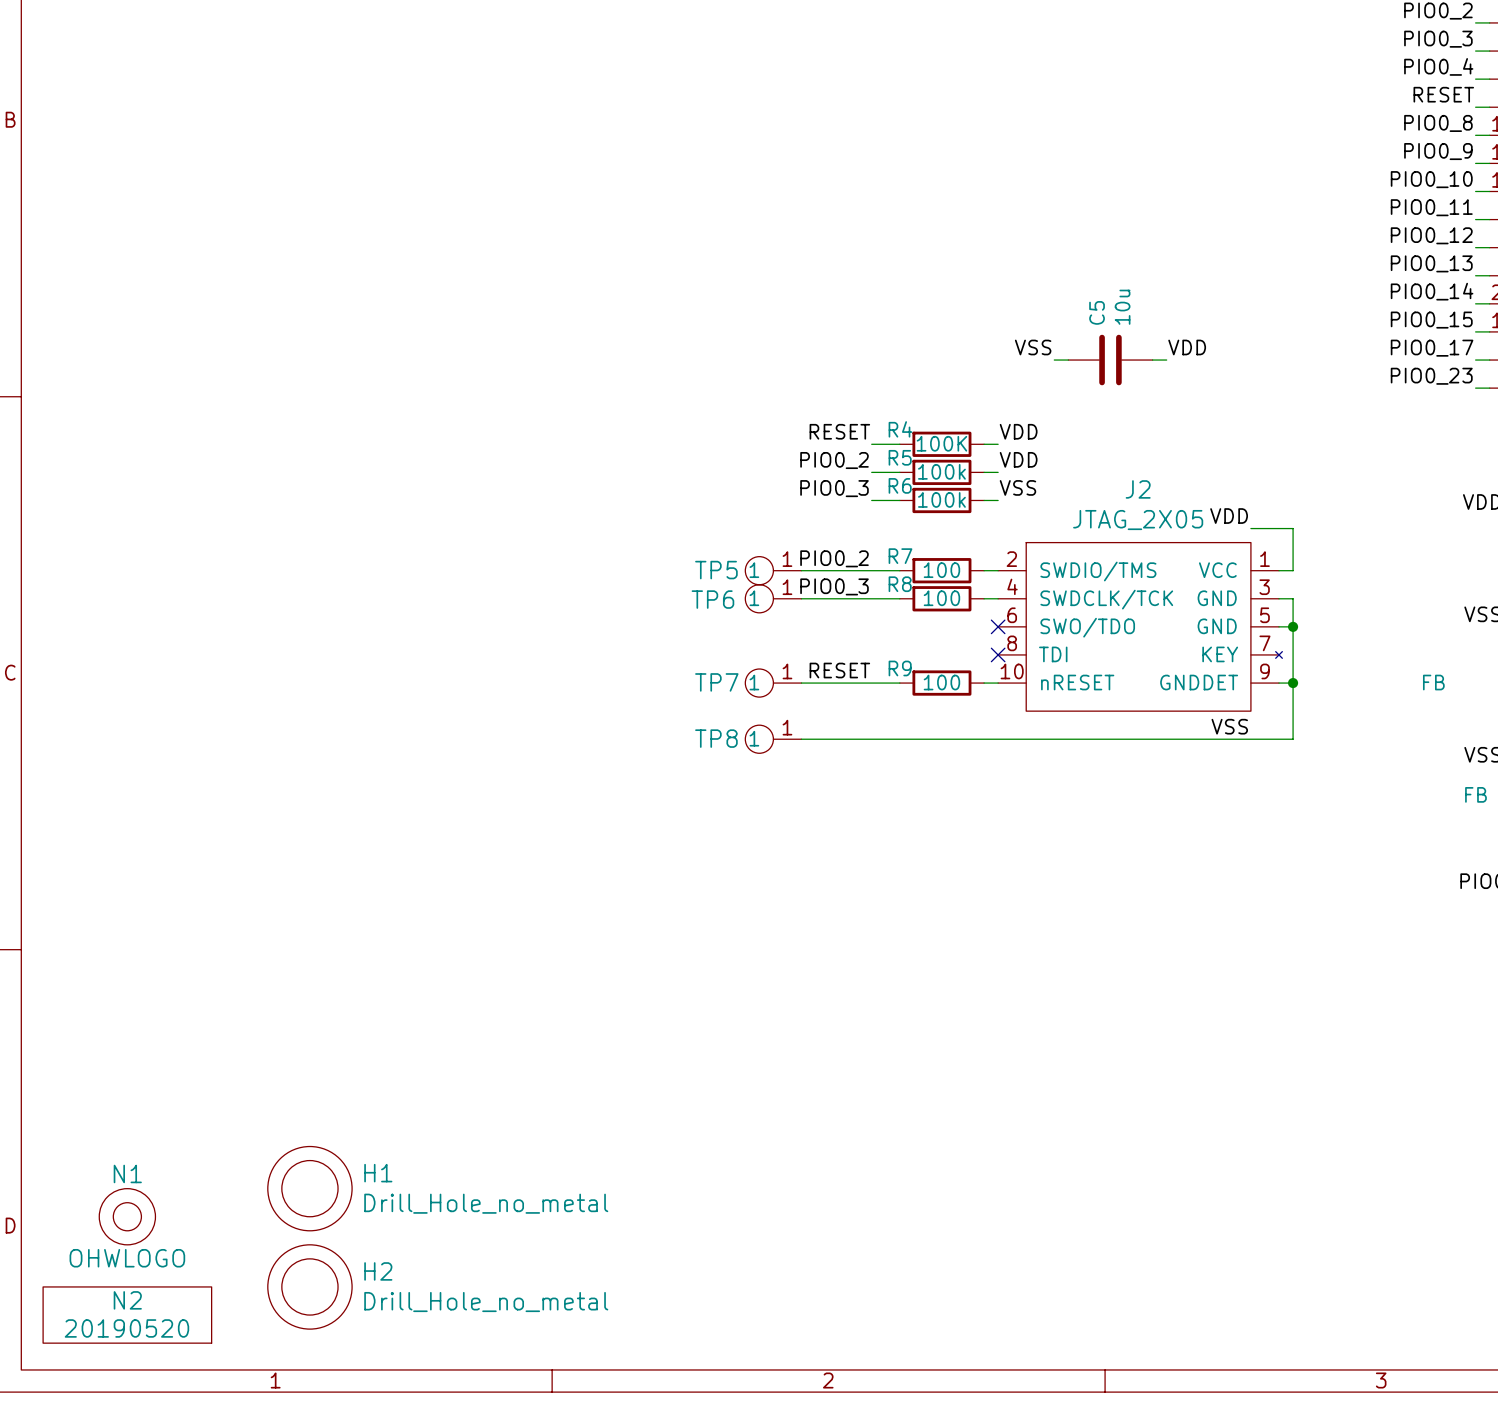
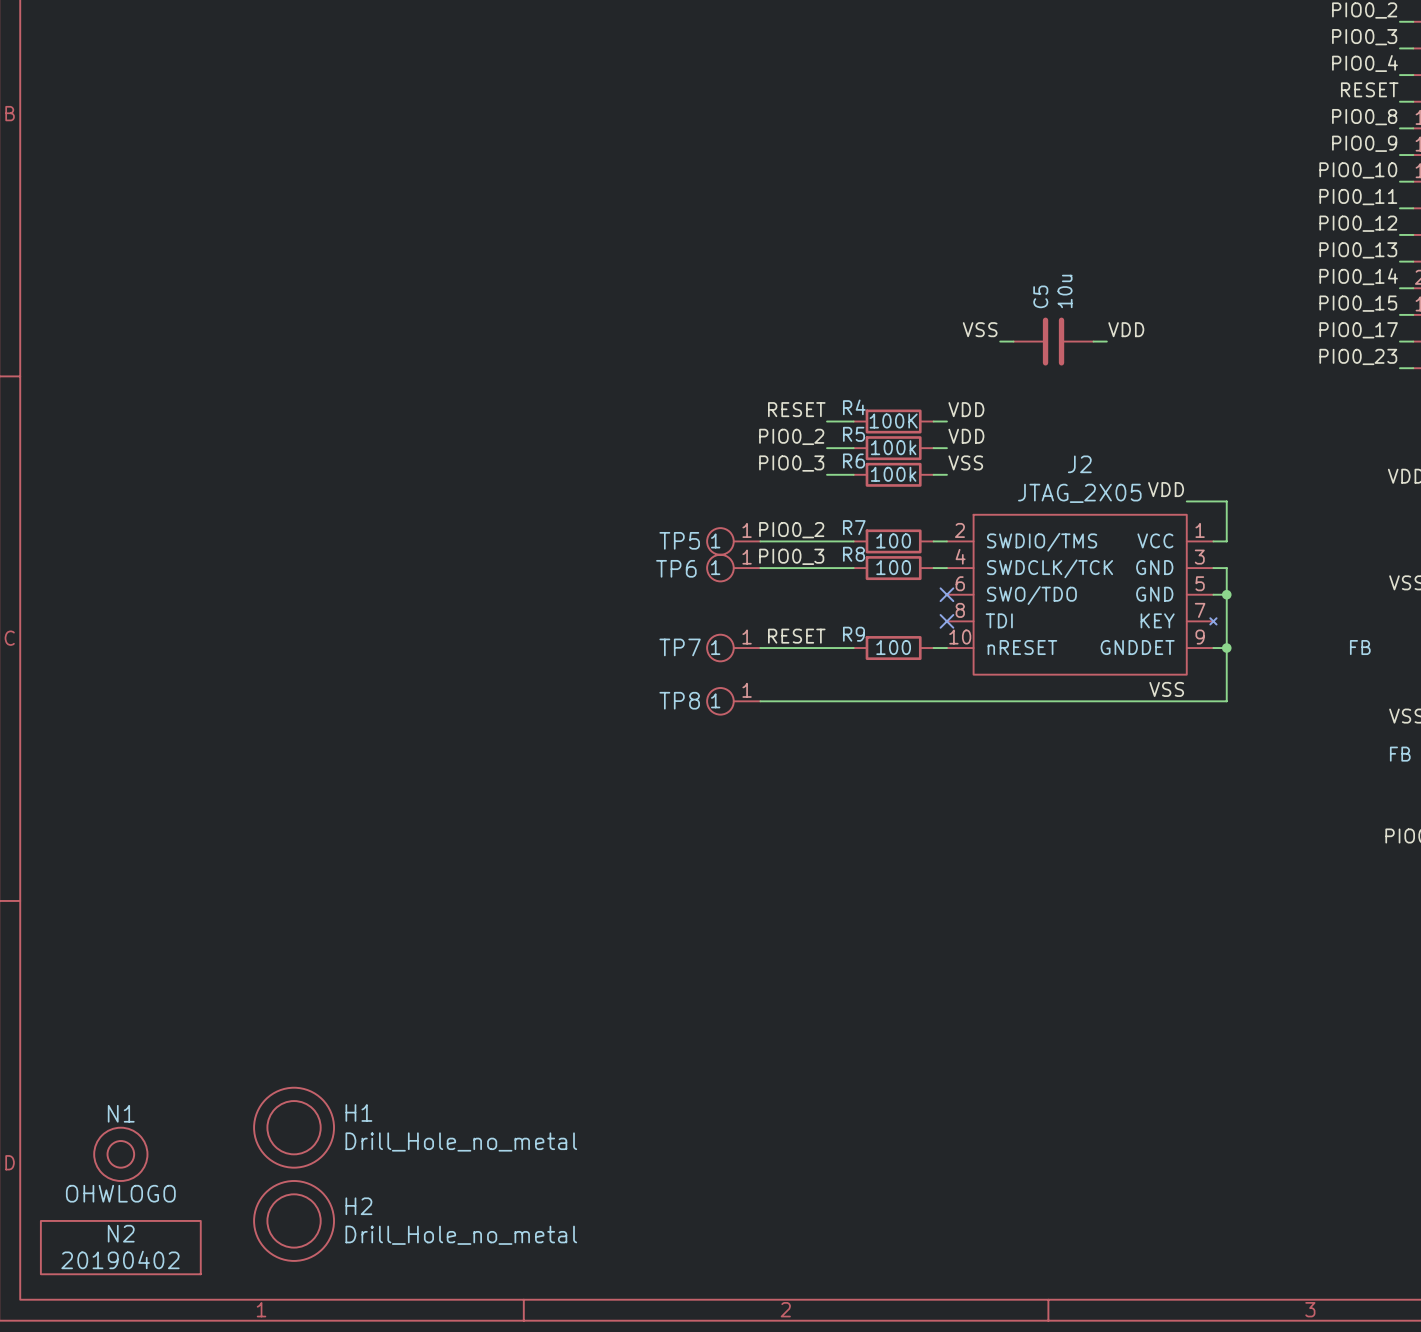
N2 value: 20190520 (126, 1328) -> 20190402 (120, 1259)

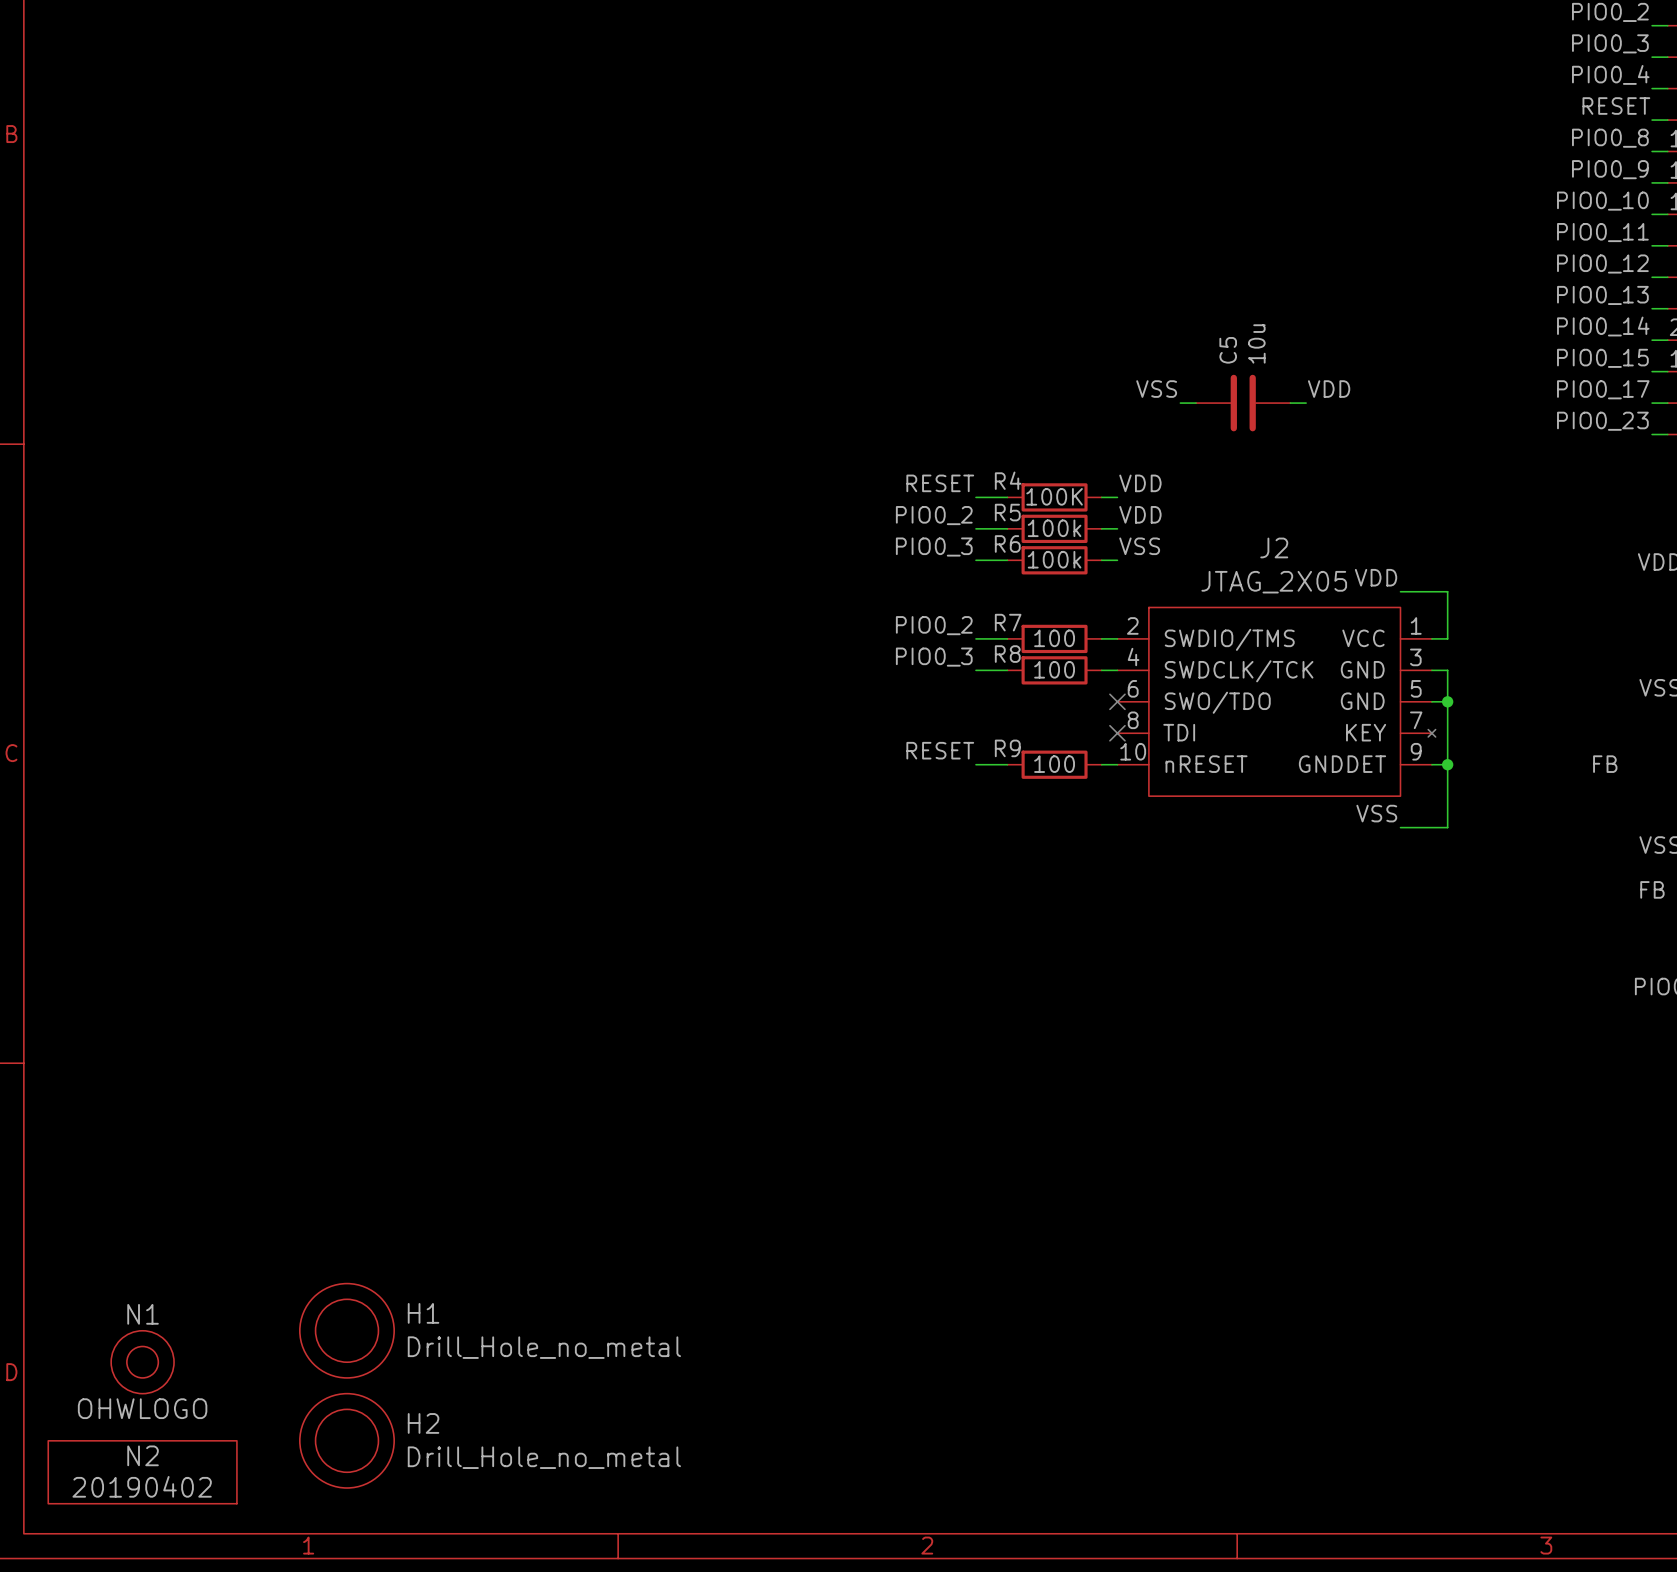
TP5: (733, 541) -> none
wire: (760, 541) (827, 541) -> none
TP6: (733, 568) -> none
wire: (760, 568) (827, 568) -> none
TP7: (733, 648) -> none
wire: (760, 648) (827, 648) -> none
TP8: (733, 701) -> none
wire: (760, 701) (1186, 701) -> none

